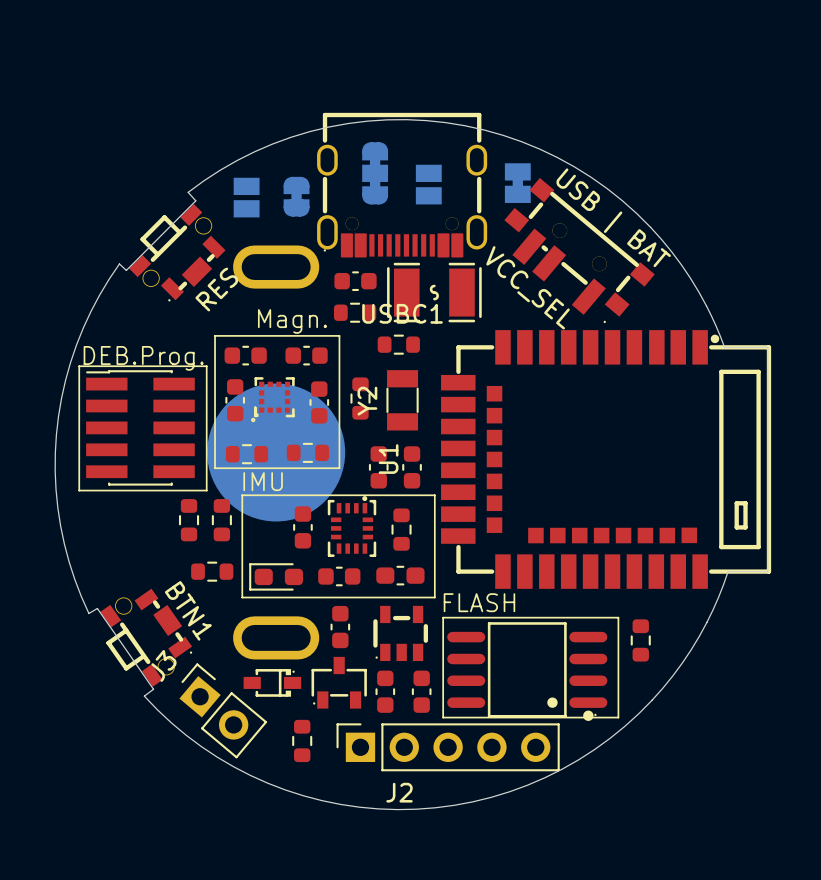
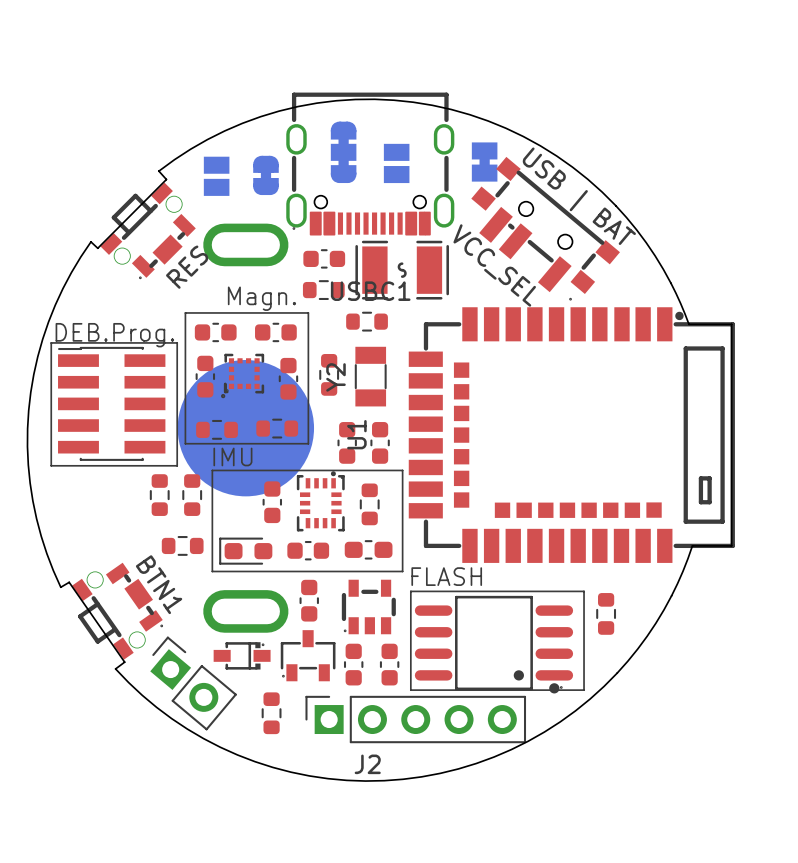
USBC1 footprint: [317, 112, 488, 258] -> [286, 92, 455, 236]
part footprint: [504, 177, 655, 323] -> [471, 156, 620, 301]
J3 name: J3 (164, 665) -> none

